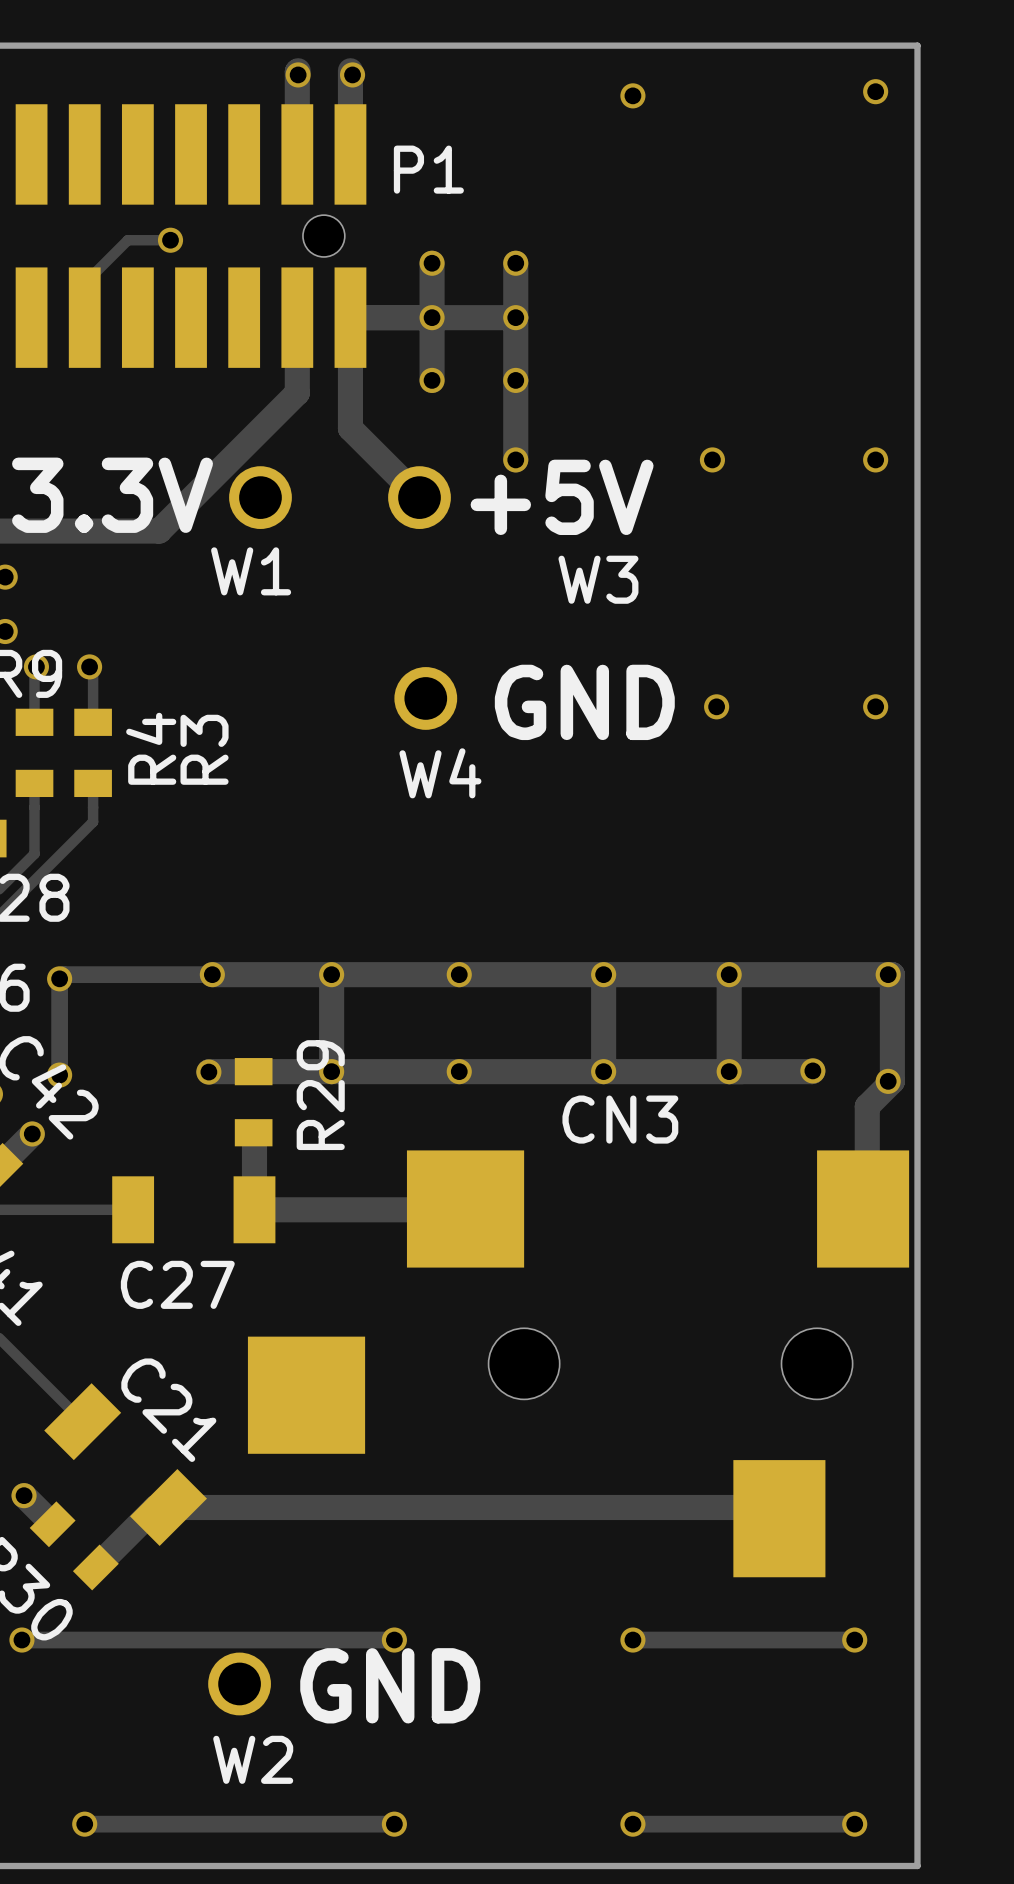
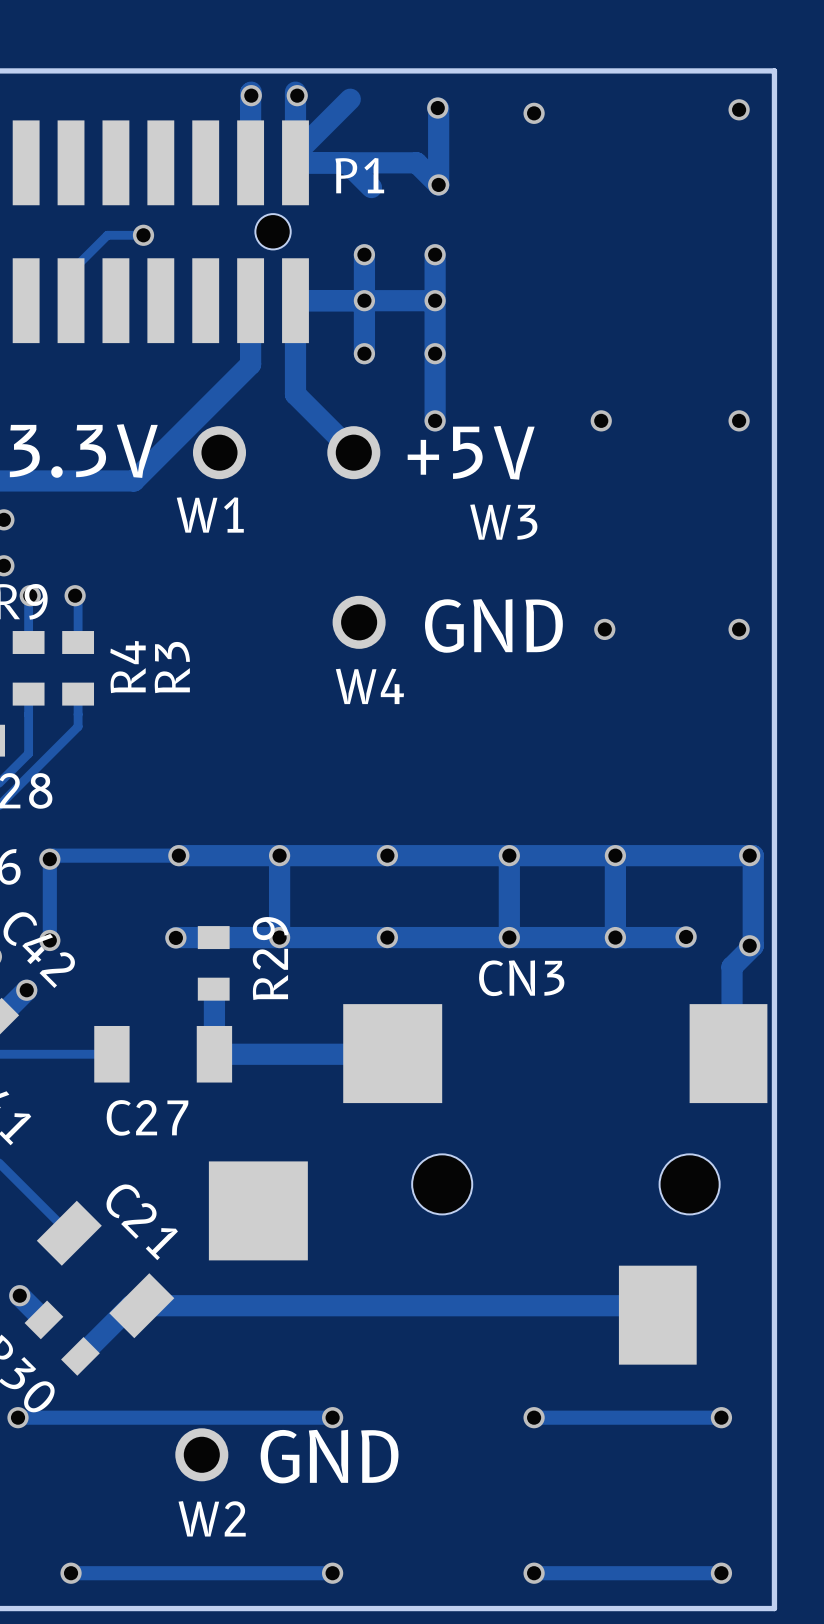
track: none -> (350, 99) (295, 153)
track: none -> (437, 108) (438, 184) (416, 162) (295, 162)
via: none -> (437, 108)
track: none -> (346, 162) (371, 187)
via: none -> (438, 184)

